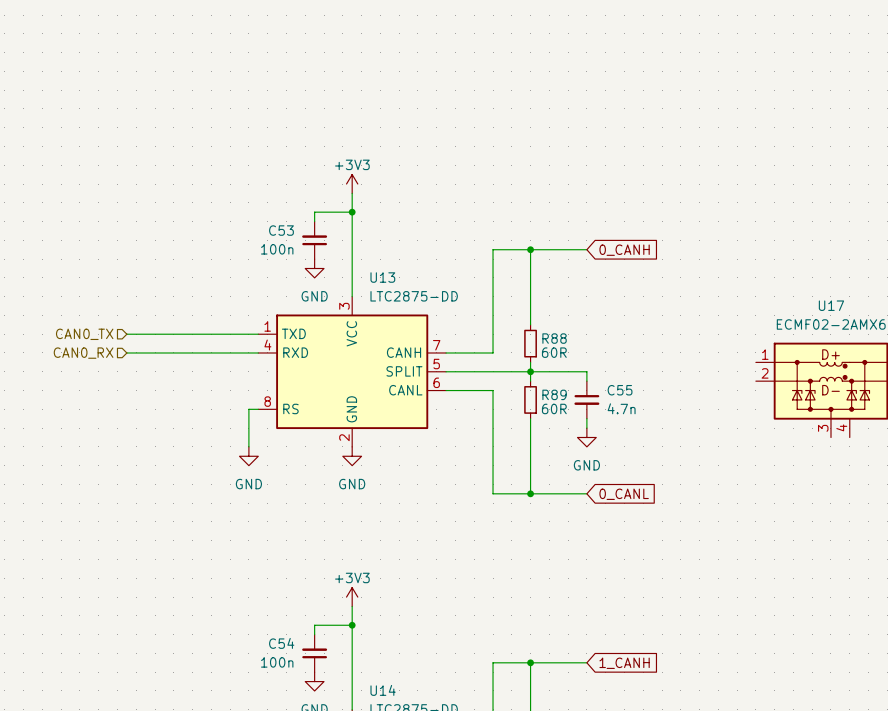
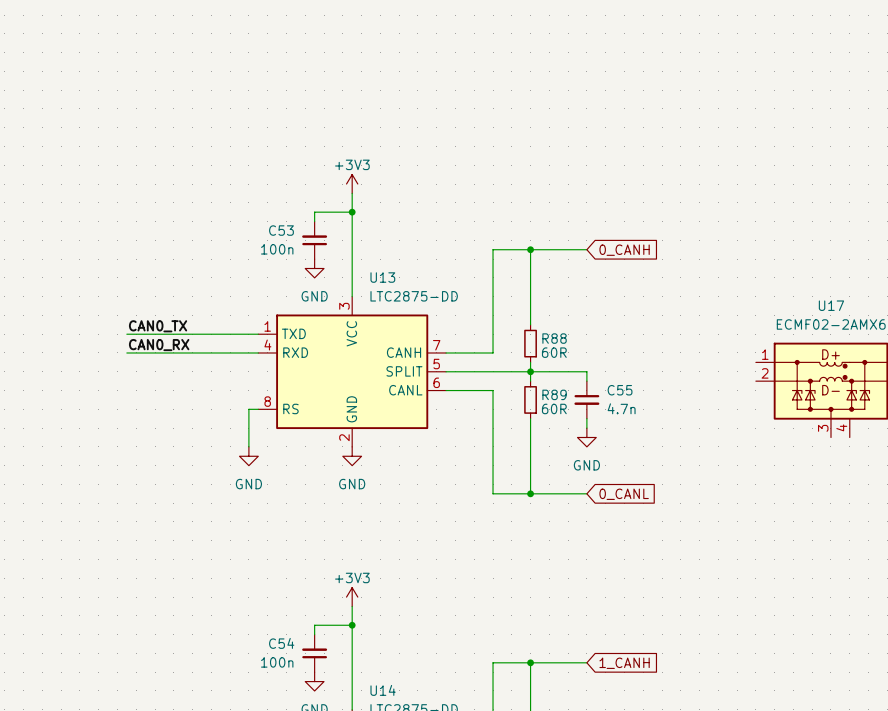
label: none -> CAN0_TX (158, 326)
hierarchical label: CAN0_TX (84, 334) -> none
label: none -> CAN0_RX (159, 345)
hierarchical label: CAN0_RX (83, 353) -> none

